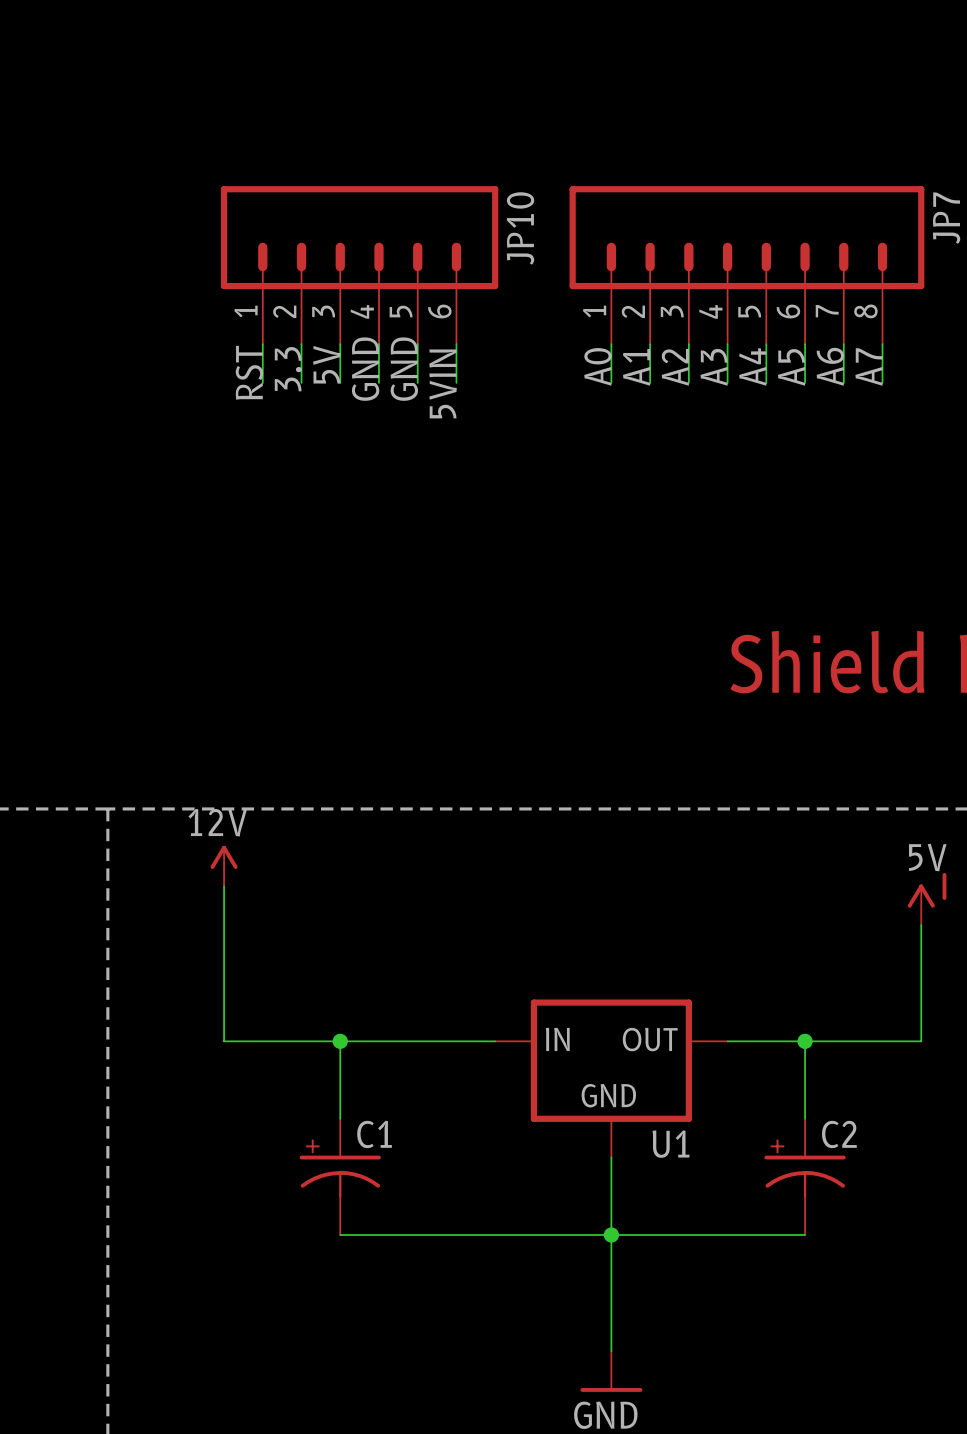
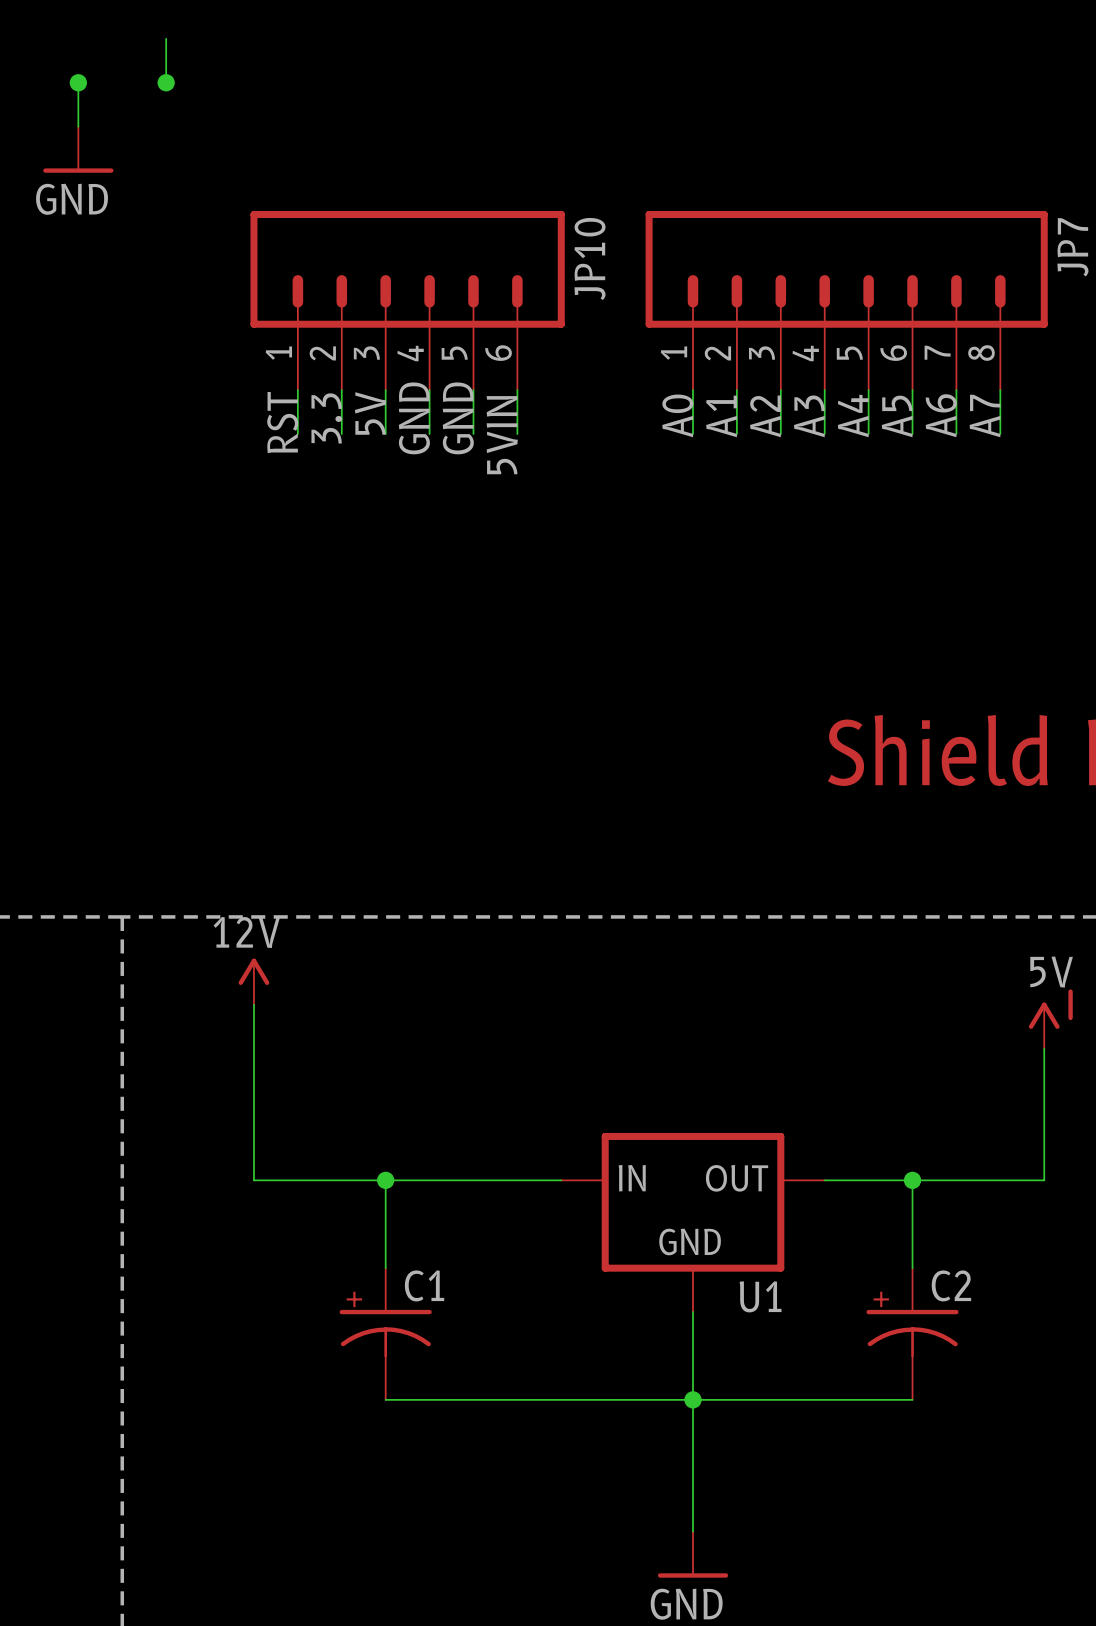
wire: none -> (166, 38) (166, 82)
wire: none -> (78, 82) (78, 126)
junction: none -> (78, 82)
junction: none -> (166, 82)
power symbol: none -> GND (78, 149)

